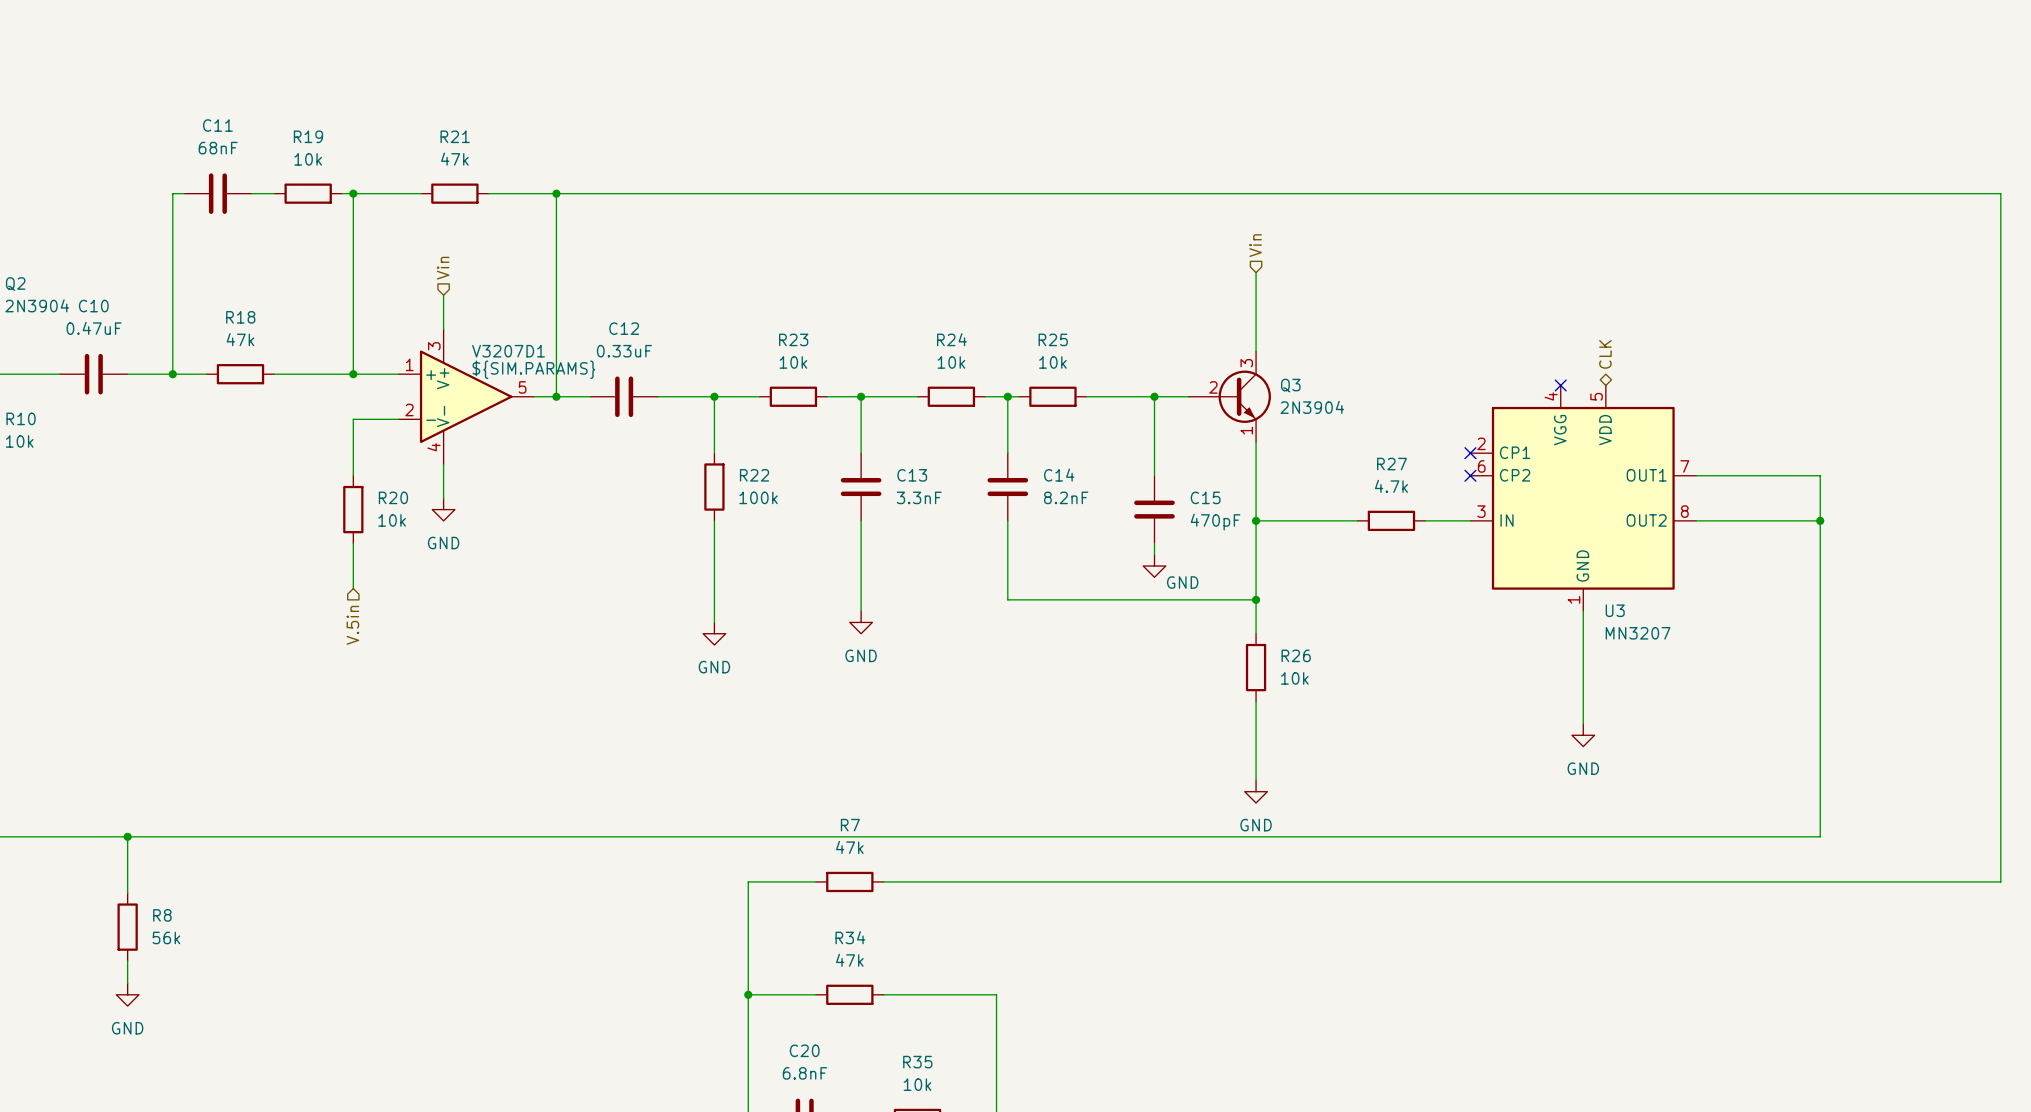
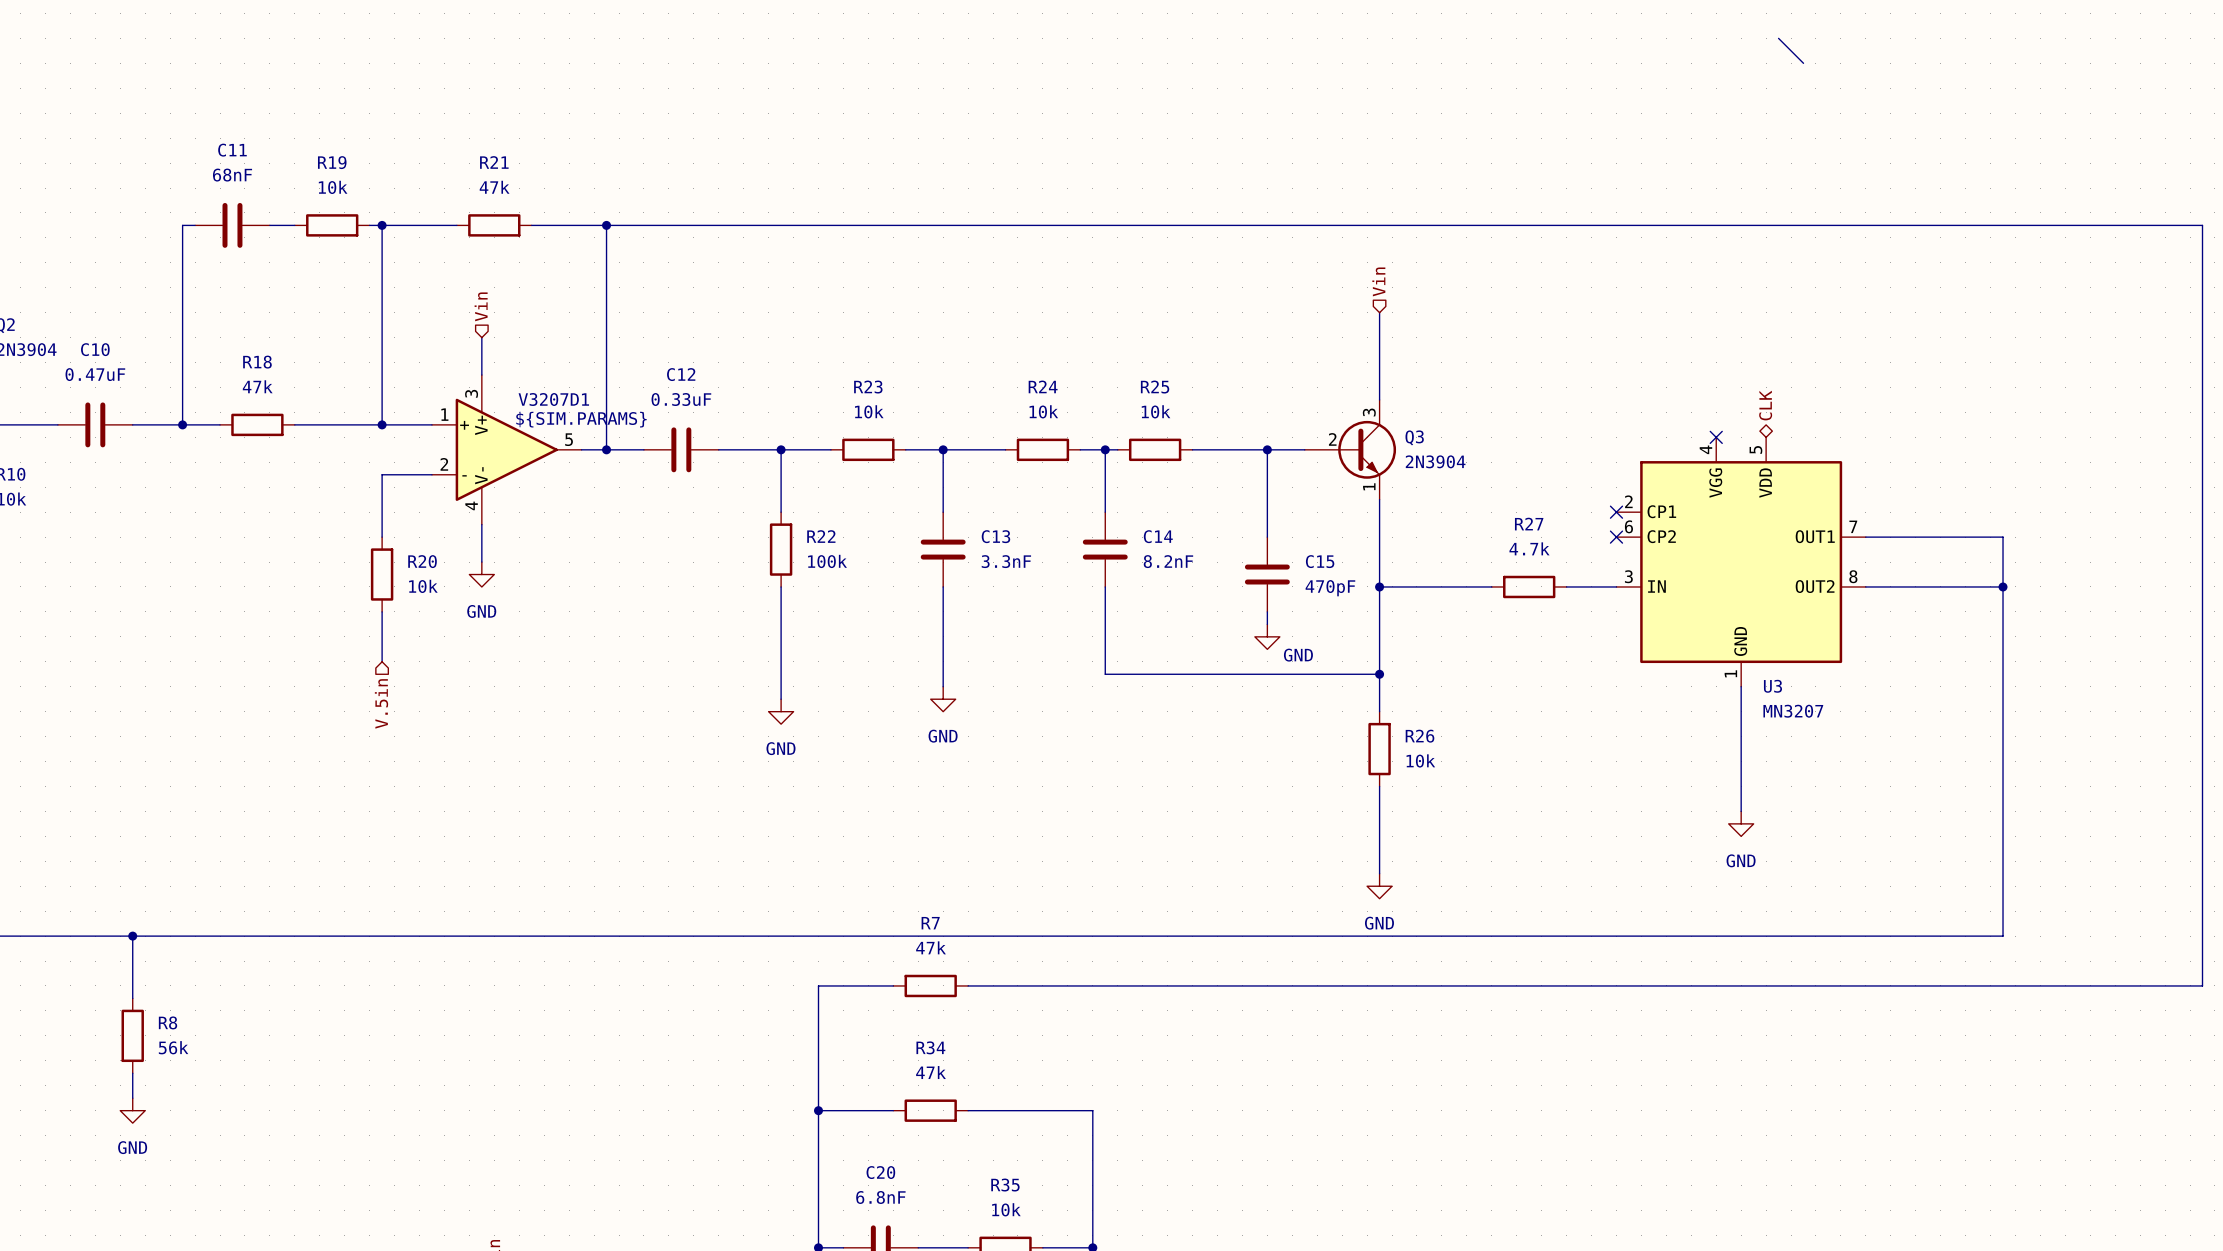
wire: none -> (1778, 38) (1803, 63)

